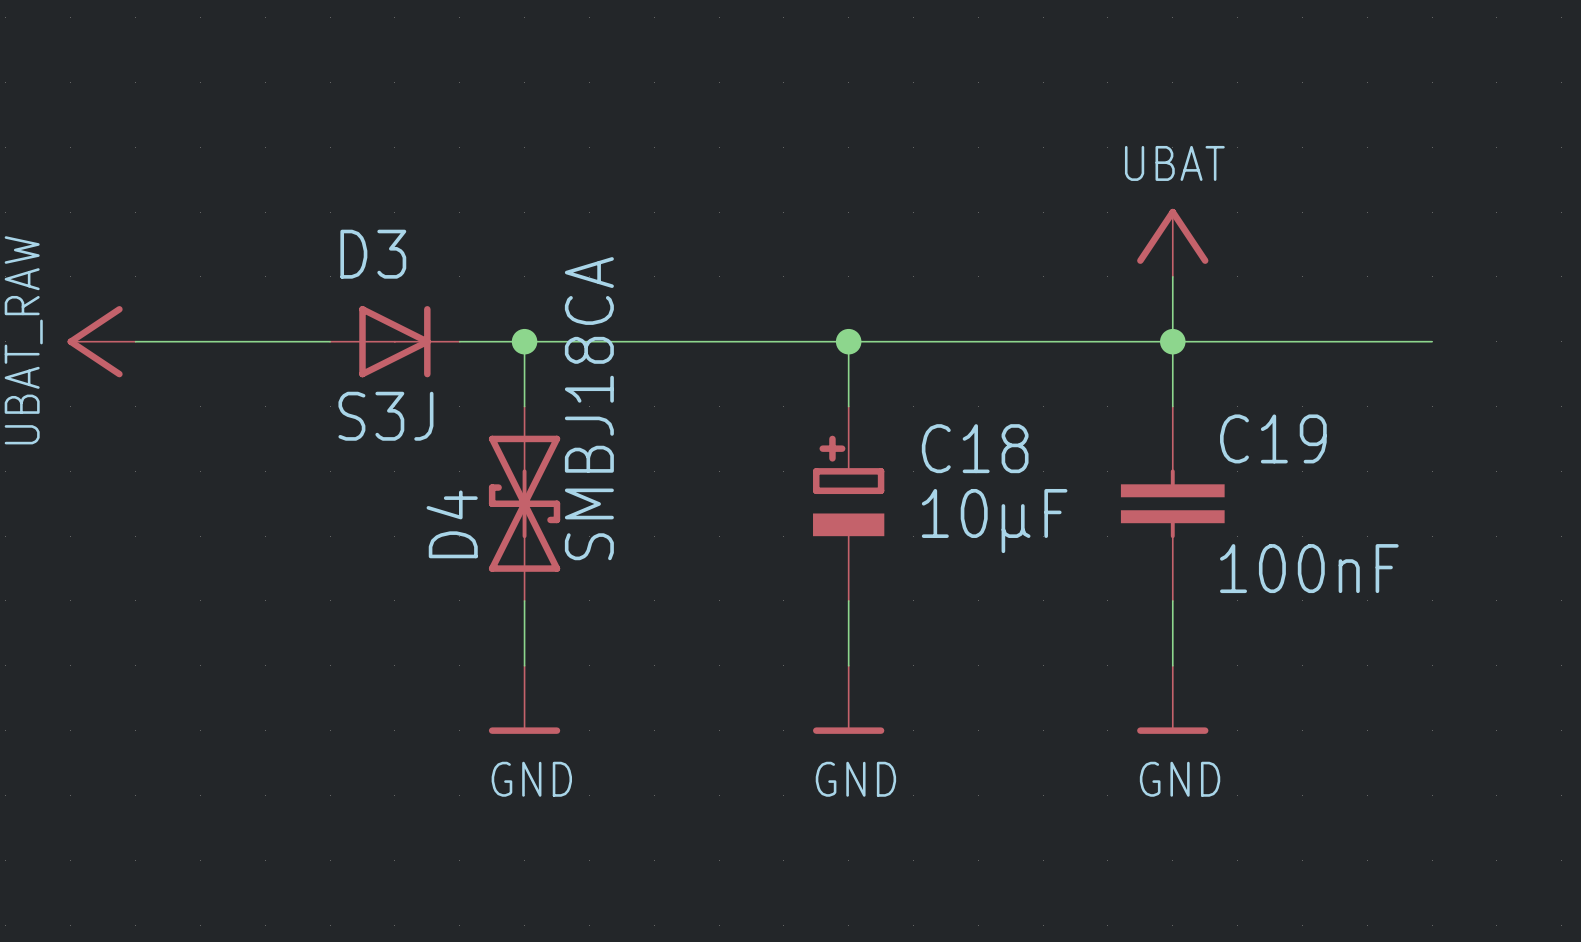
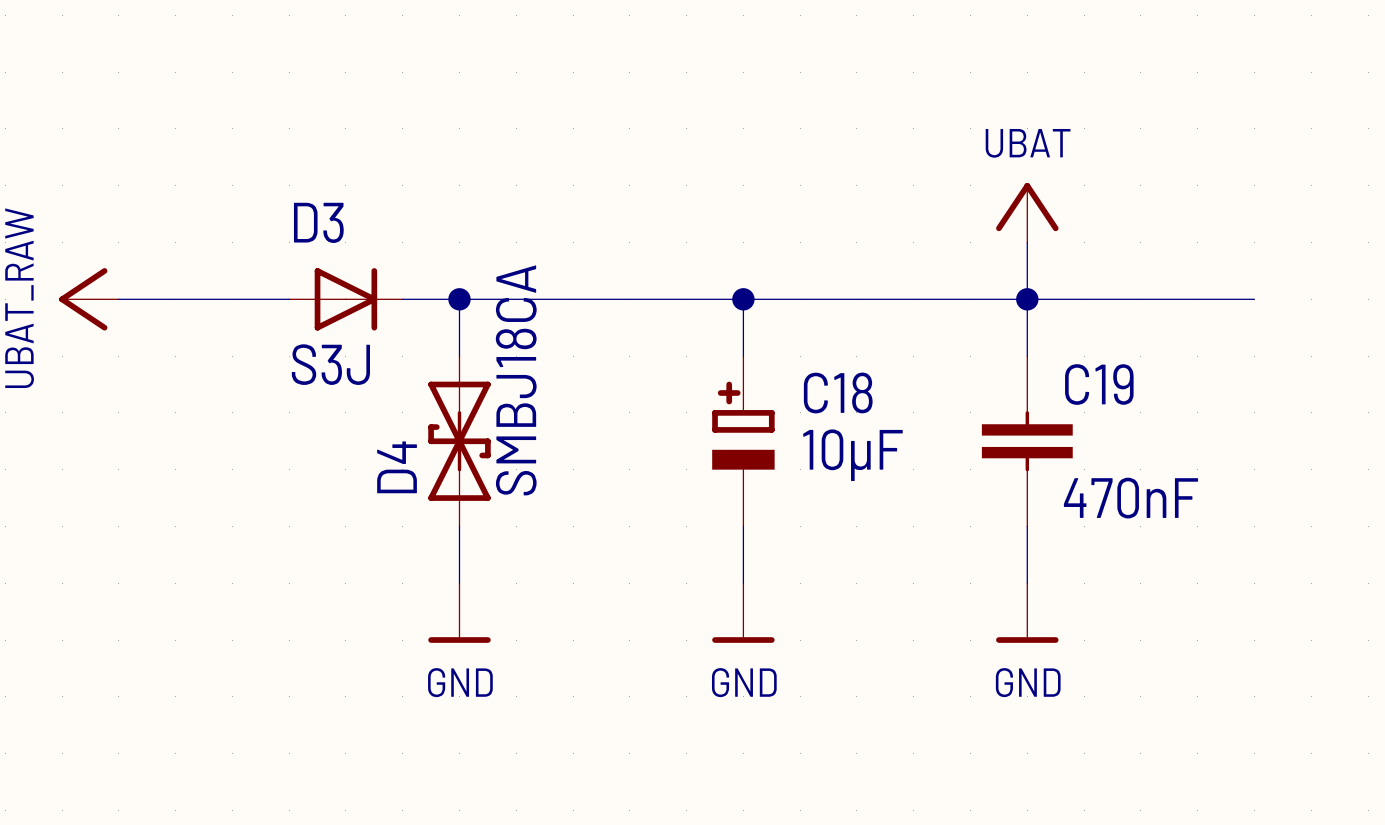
C19 value: 100nF (1309, 568) -> 470nF (1130, 498)

